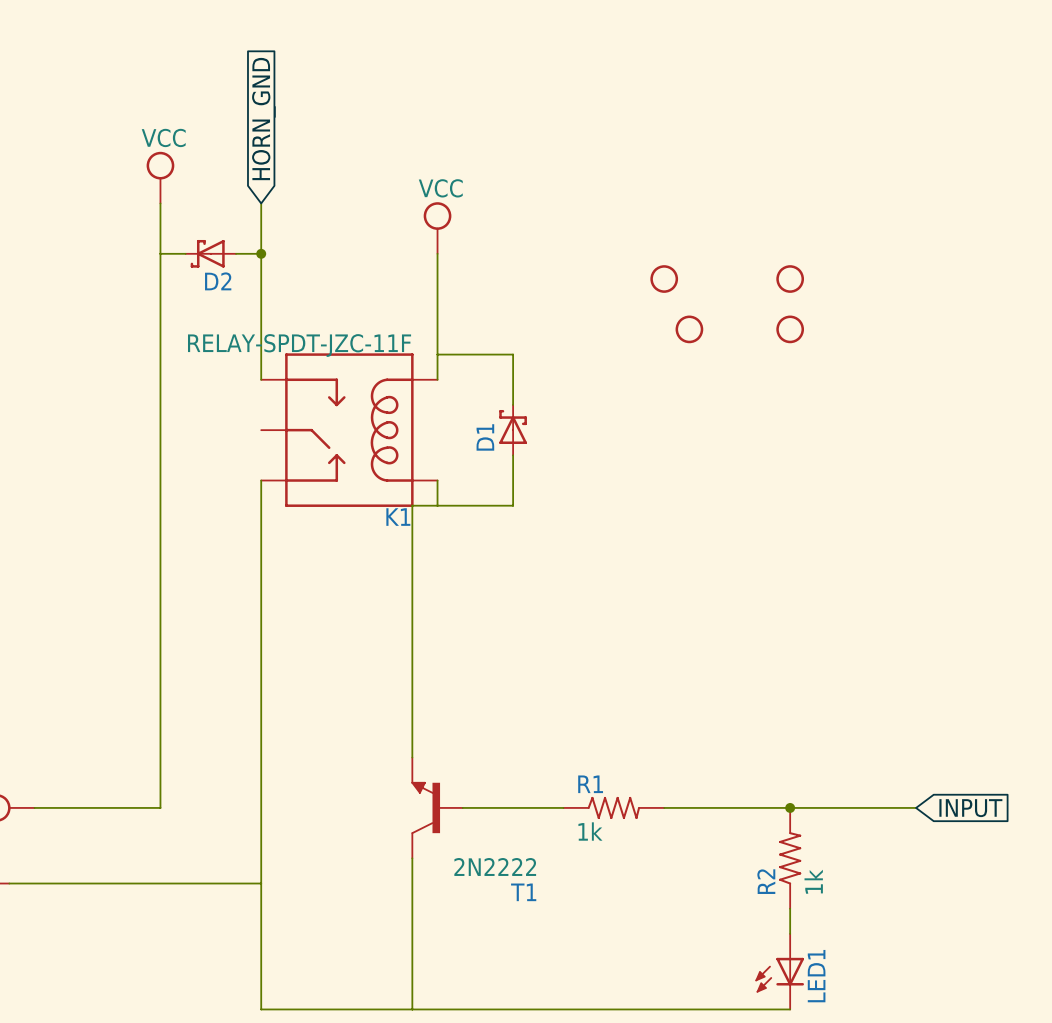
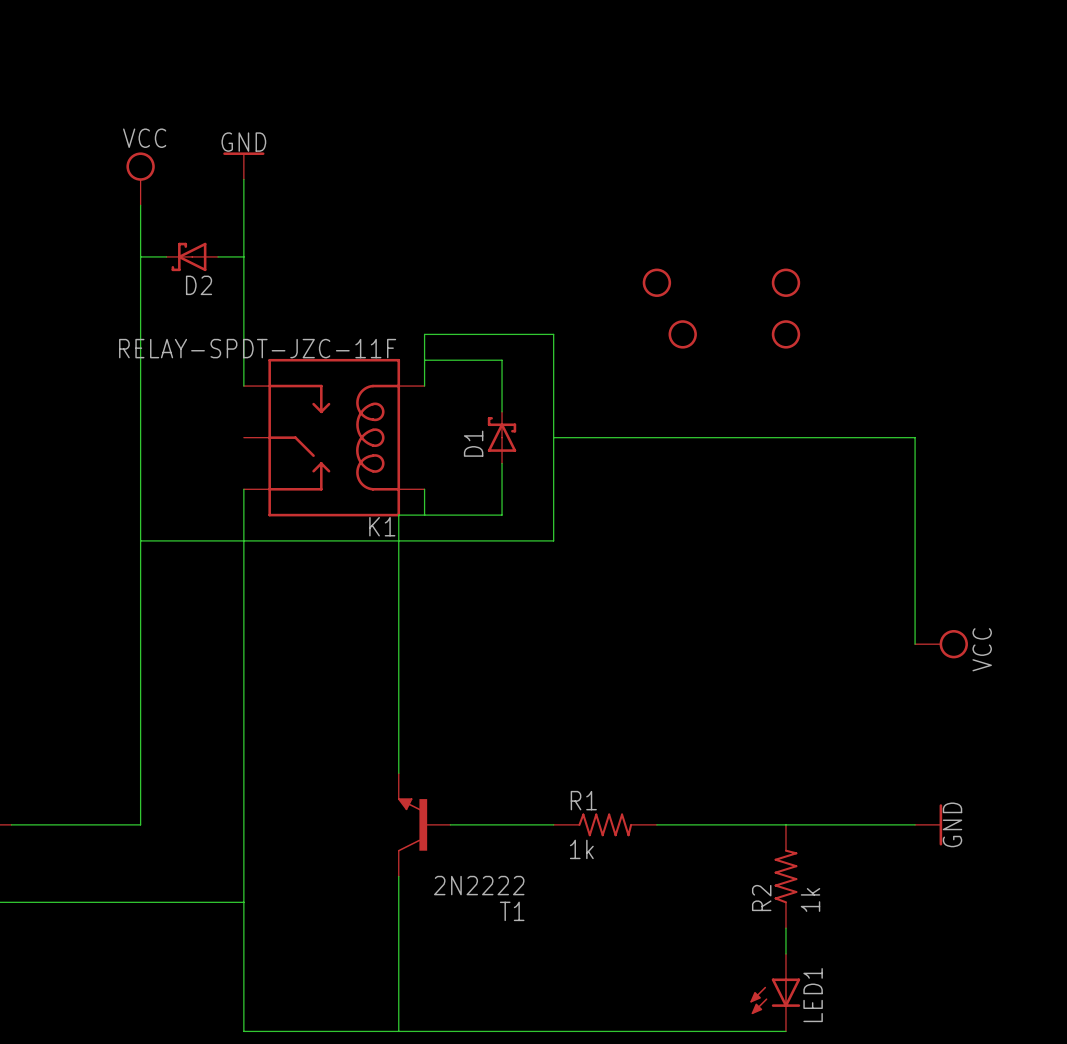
global label: HORN_GND (263, 119) -> none
power symbol: none -> GND (243, 165)
wire: none -> (243, 179) (243, 205)
power symbol: VCC (437, 228) -> none
junction: (261, 253) -> none
wire: (437, 253) (437, 329) -> (140, 540) (553, 540) (553, 334) (424, 334)
wire: none -> (553, 437) (915, 437) (915, 644)
power symbol: none -> VCC (941, 644)
junction: (790, 807) -> none
power symbol: none -> GND (928, 824)
global label: INPUT (970, 808) -> none

